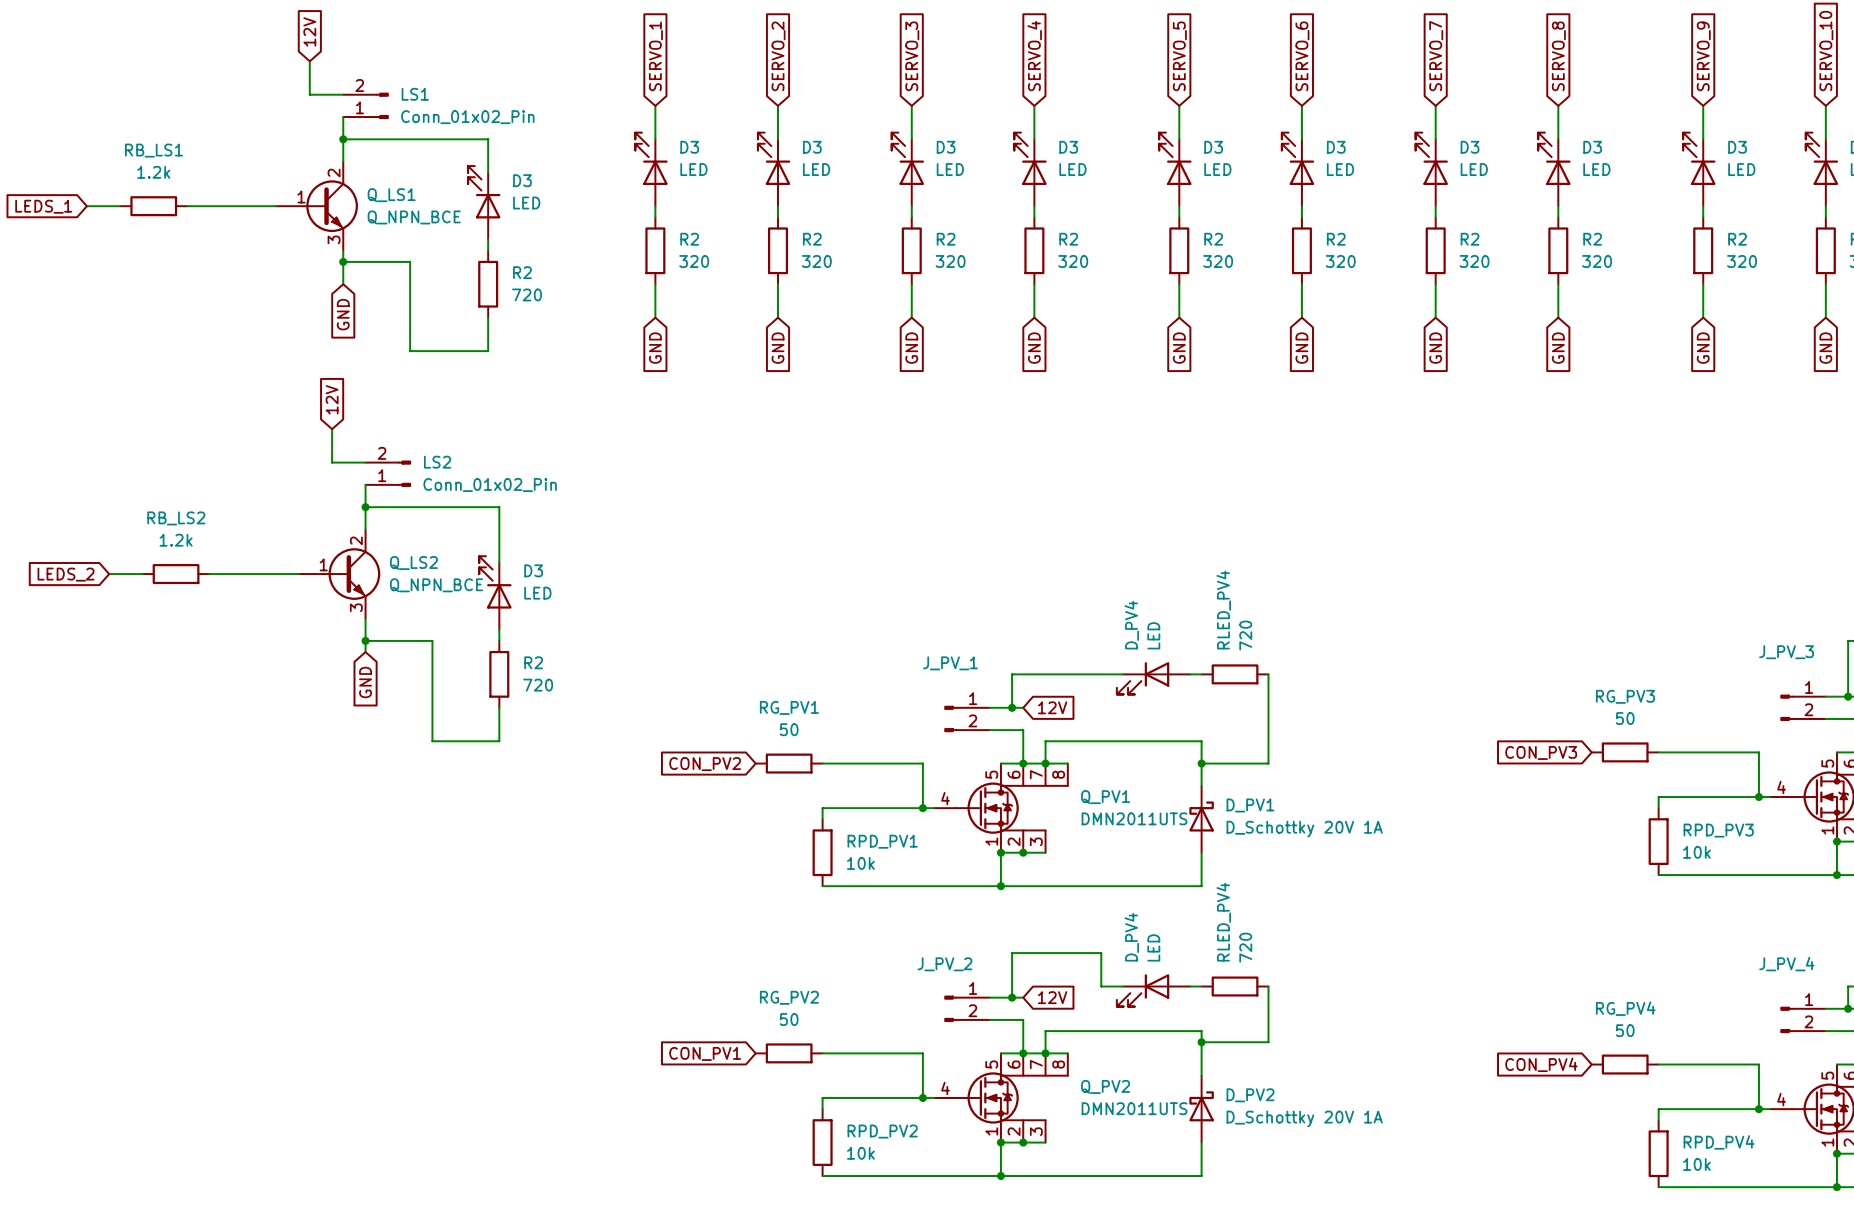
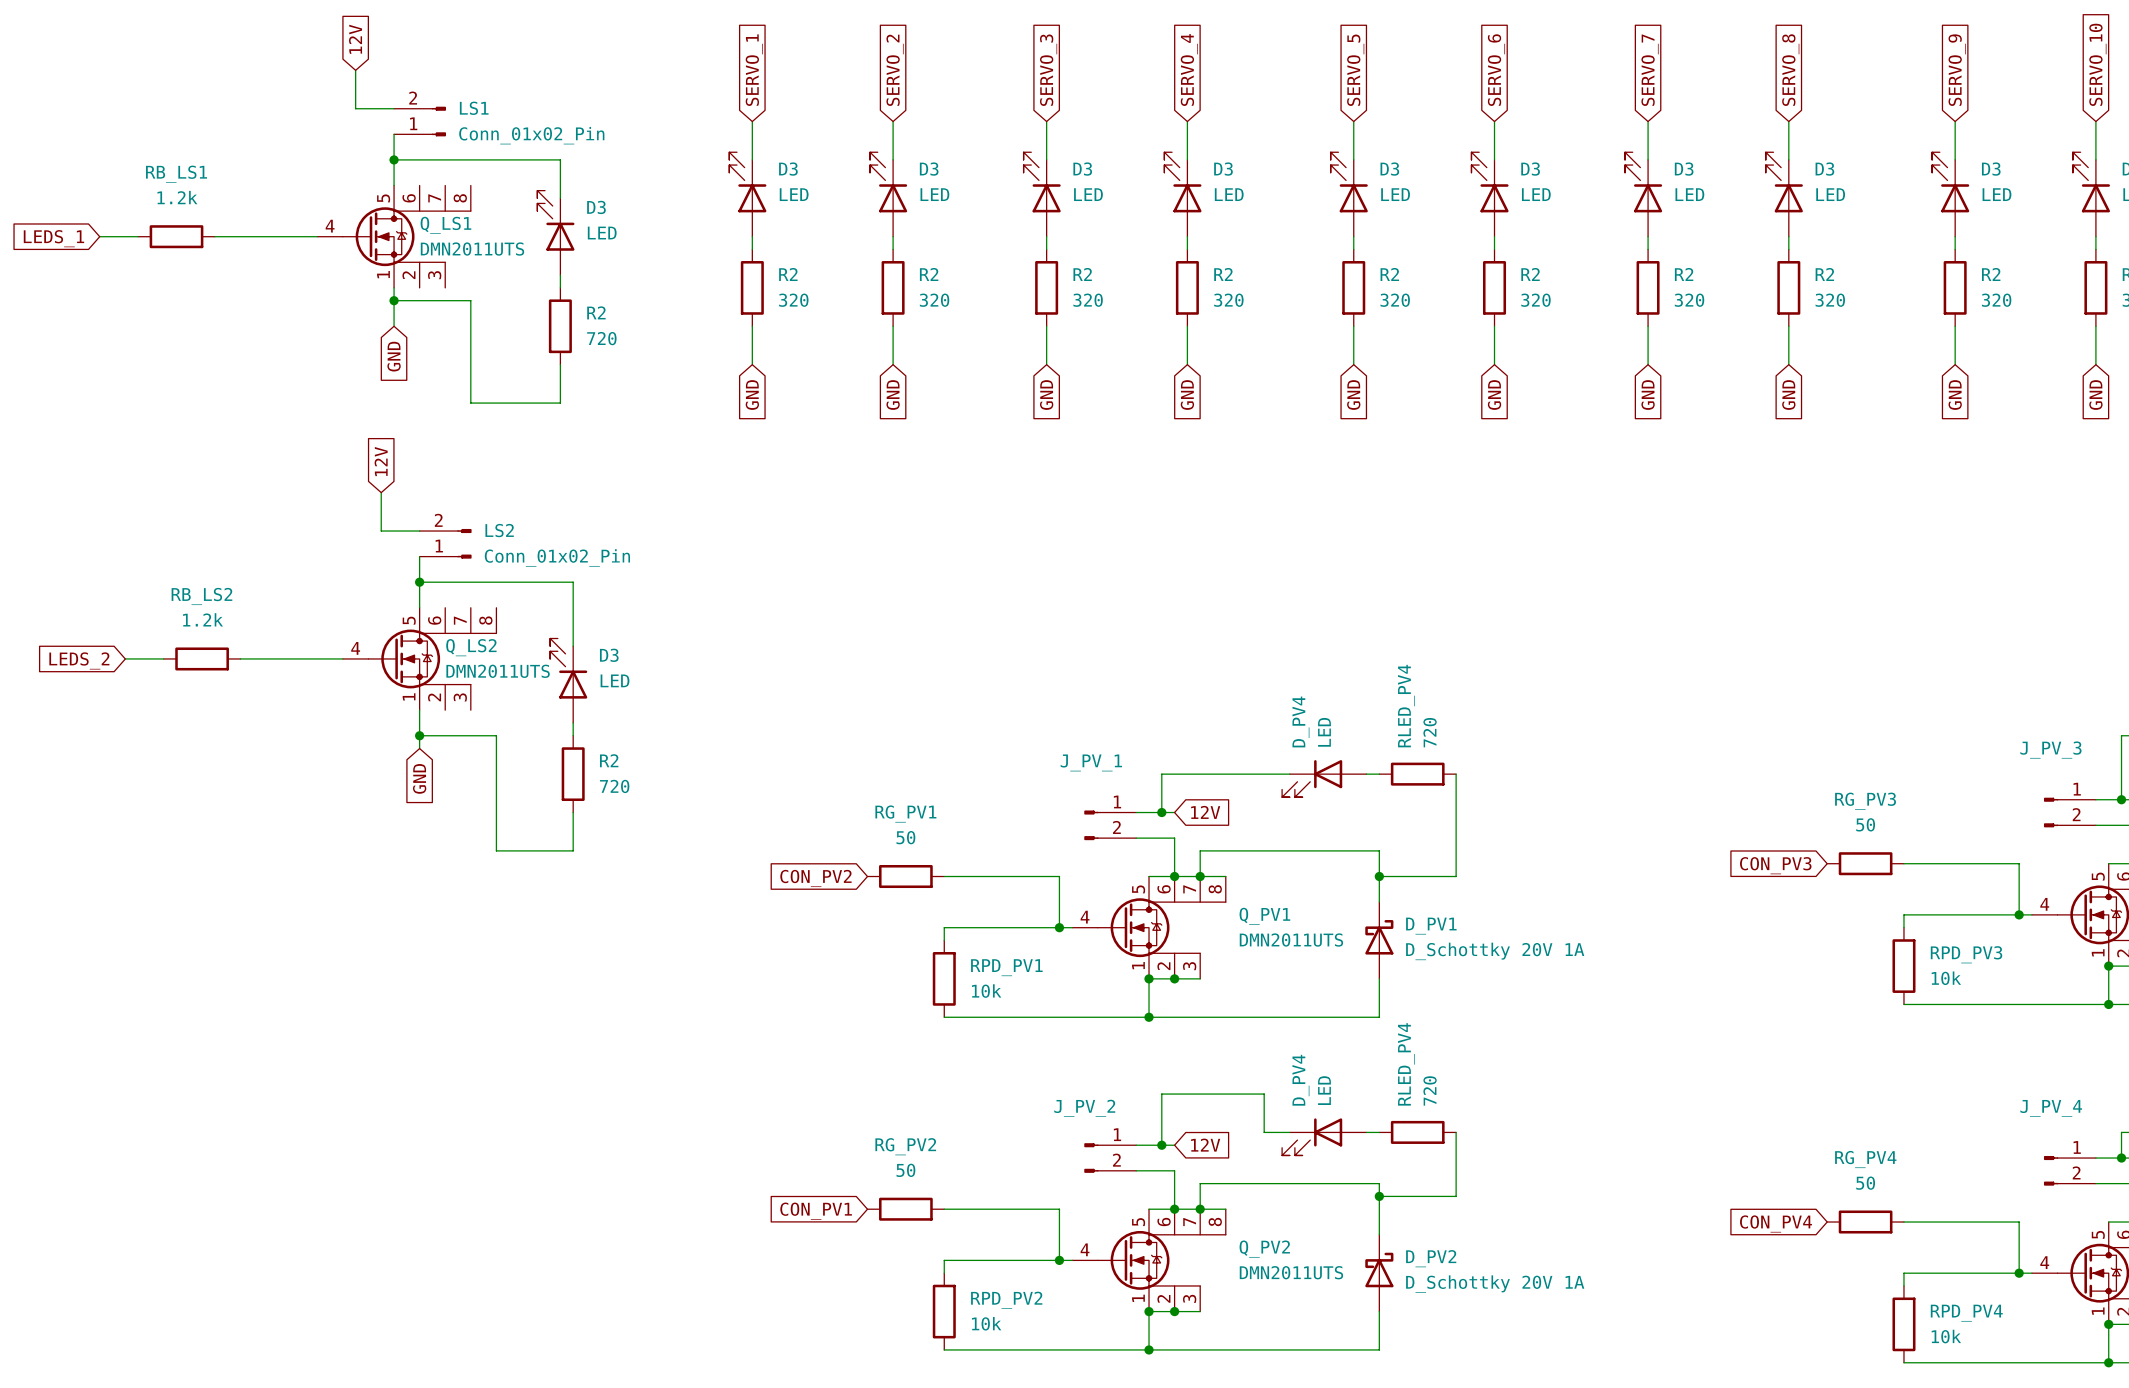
Q_LS1 symbol: [276, 161, 358, 251] -> [317, 185, 471, 288]
Q_LS1 value: Q_NPN_BCE (414, 217) -> DMN2011UTS (472, 249)
Q_LS2 symbol: [298, 529, 381, 619] -> [342, 607, 497, 711]
Q_LS2 value: Q_NPN_BCE (436, 585) -> DMN2011UTS (498, 671)

